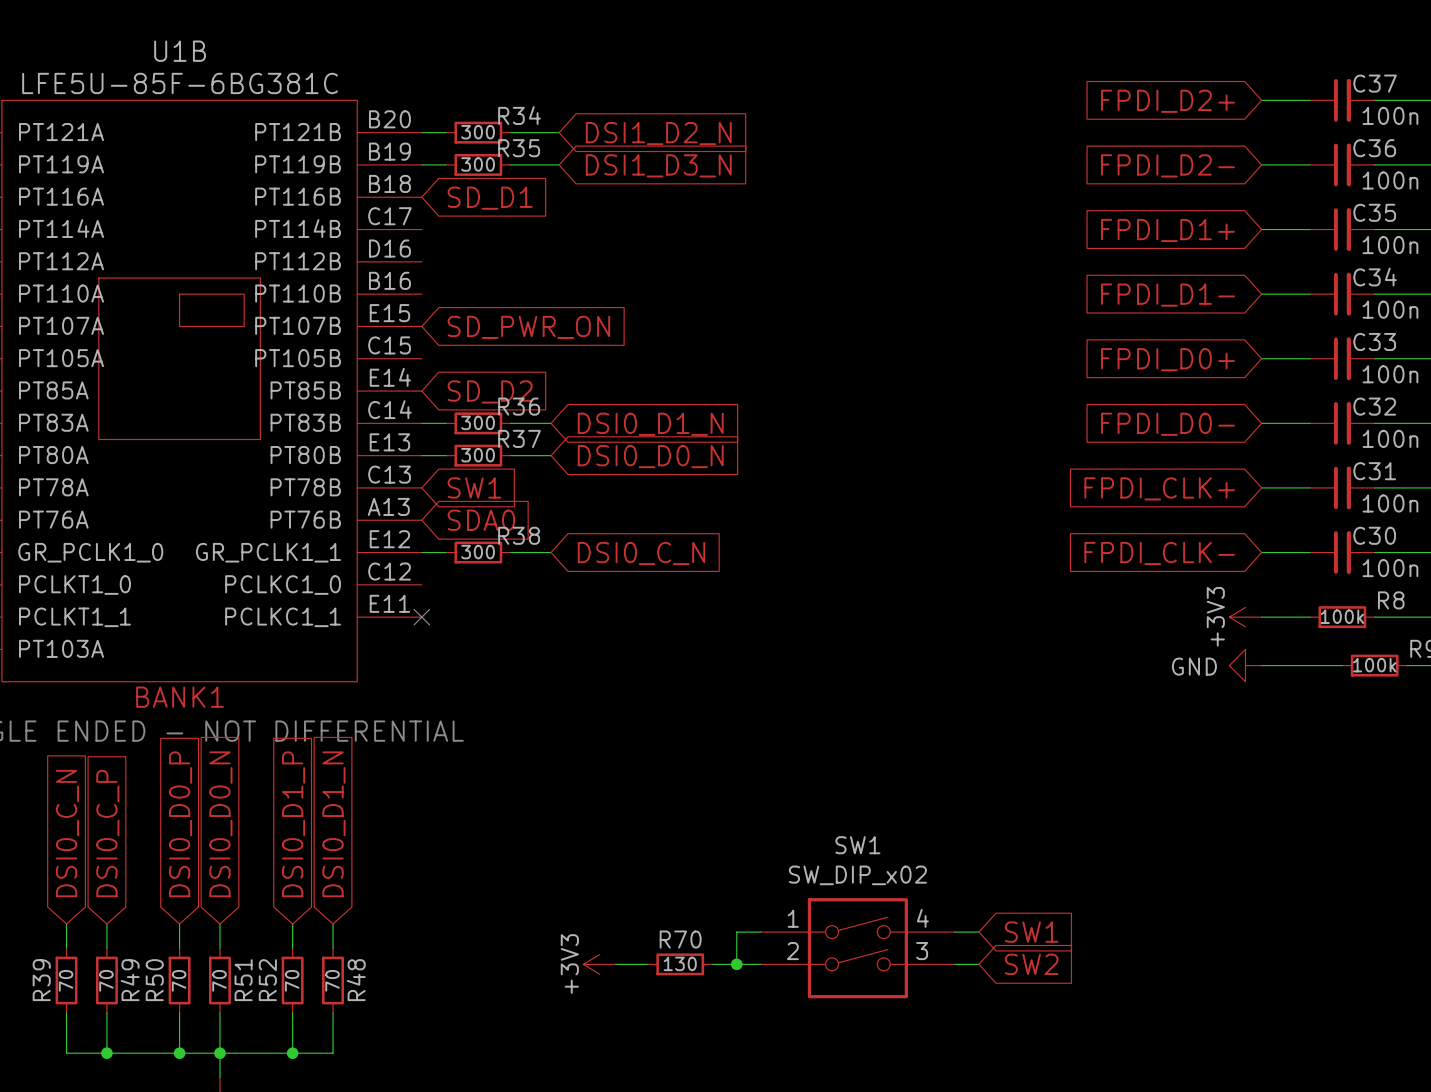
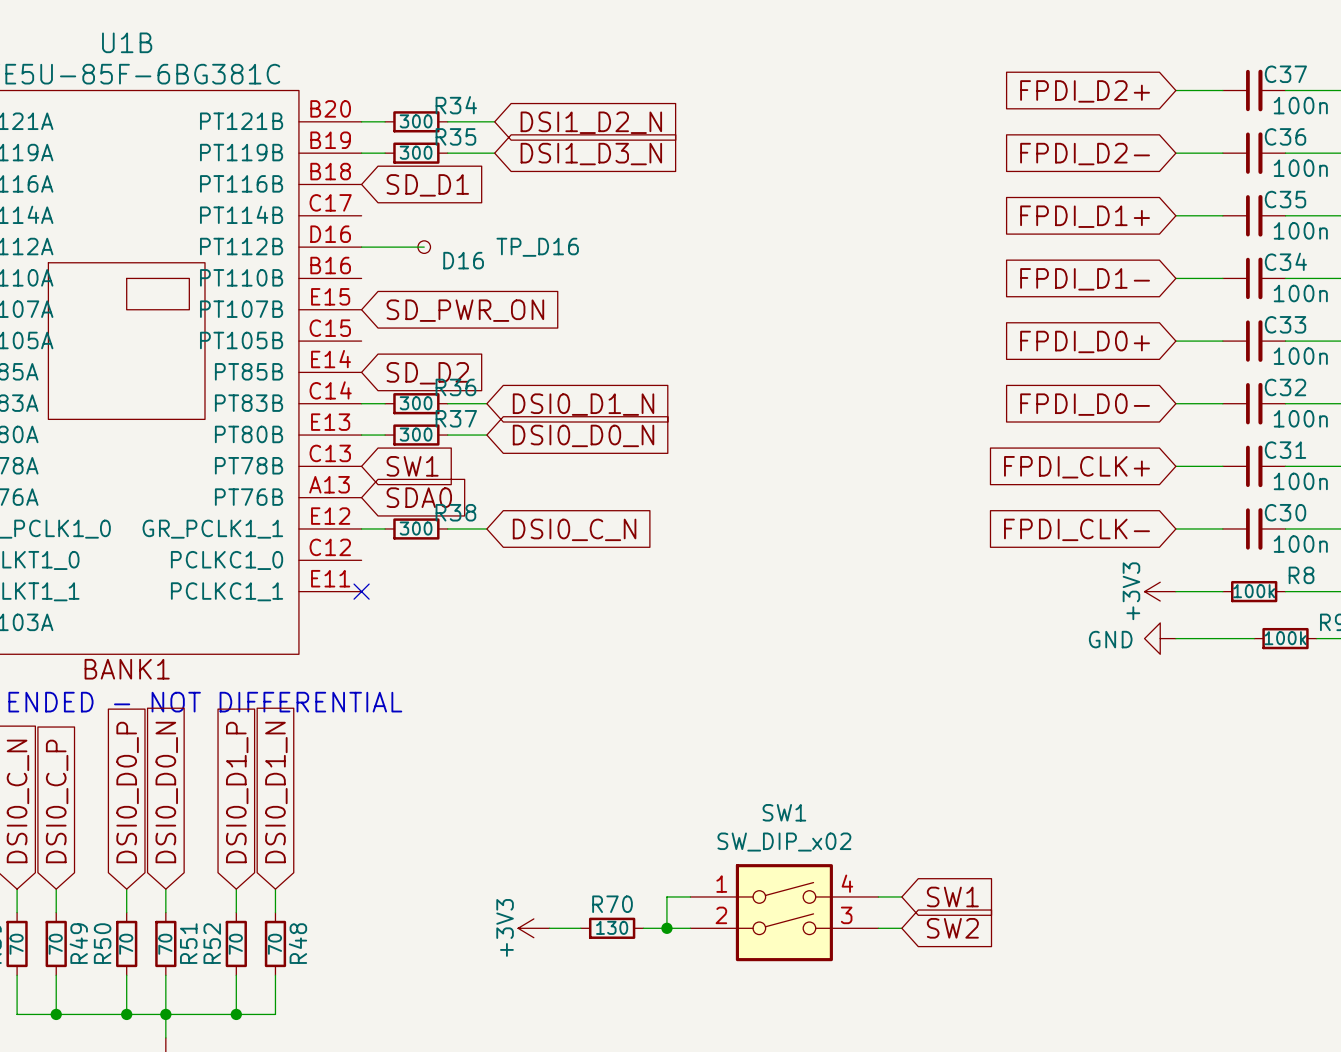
wire: none -> (361, 247) (424, 247)
TP_D16: none -> D16 (424, 247)

